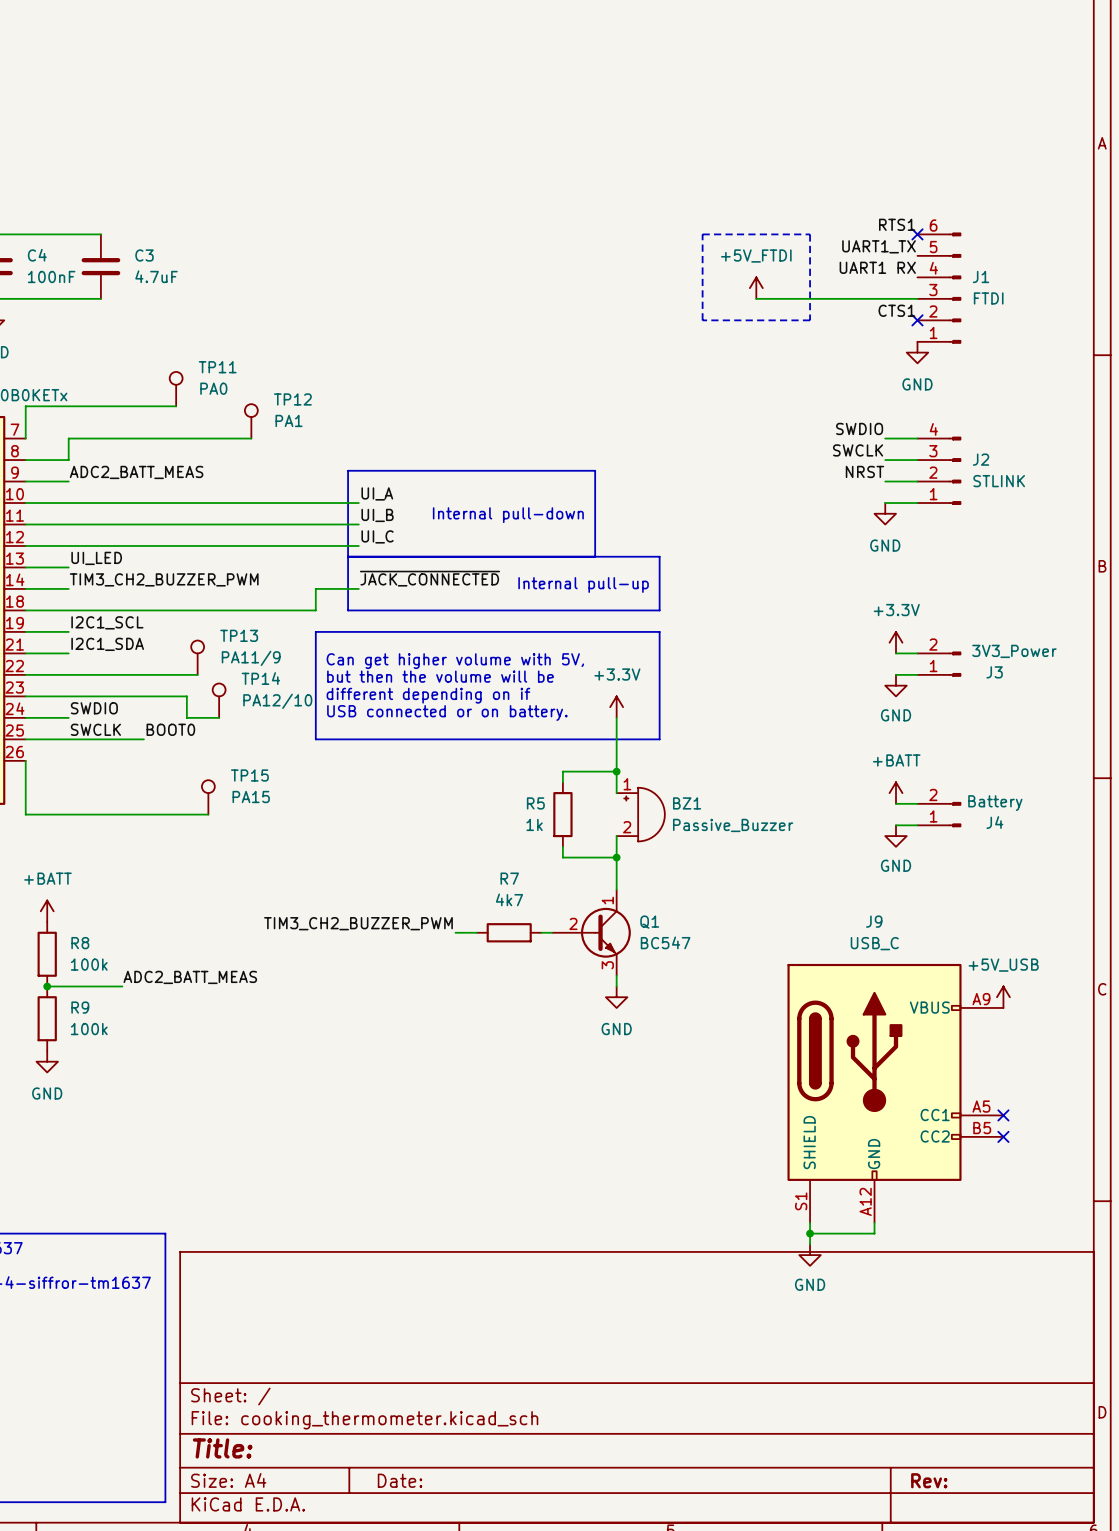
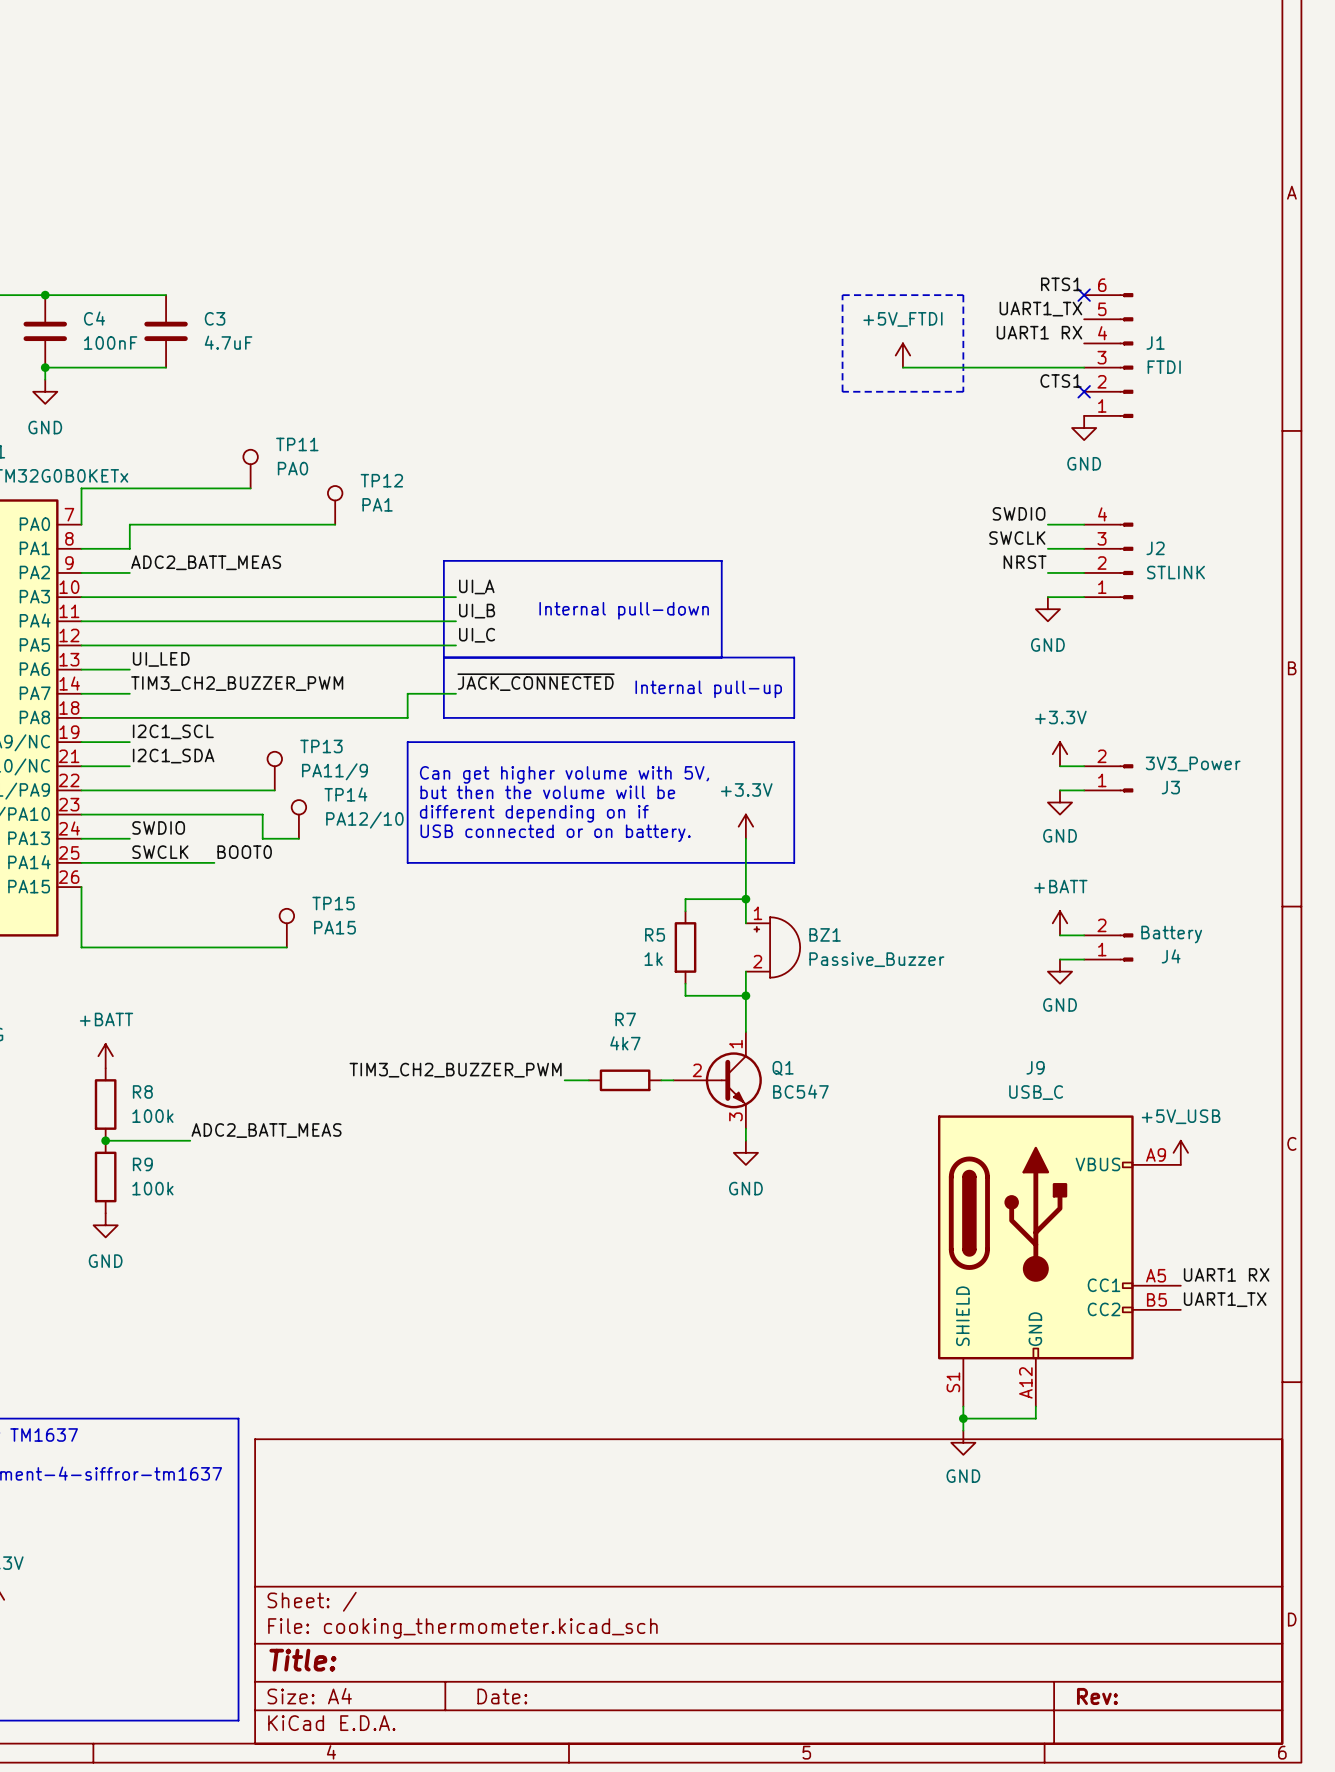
label: none -> UART1 RX (1226, 1274)
no-connect mark: (1003, 1115) -> none
label: none -> UART1_TX (1225, 1299)
no-connect mark: (1003, 1136) -> none

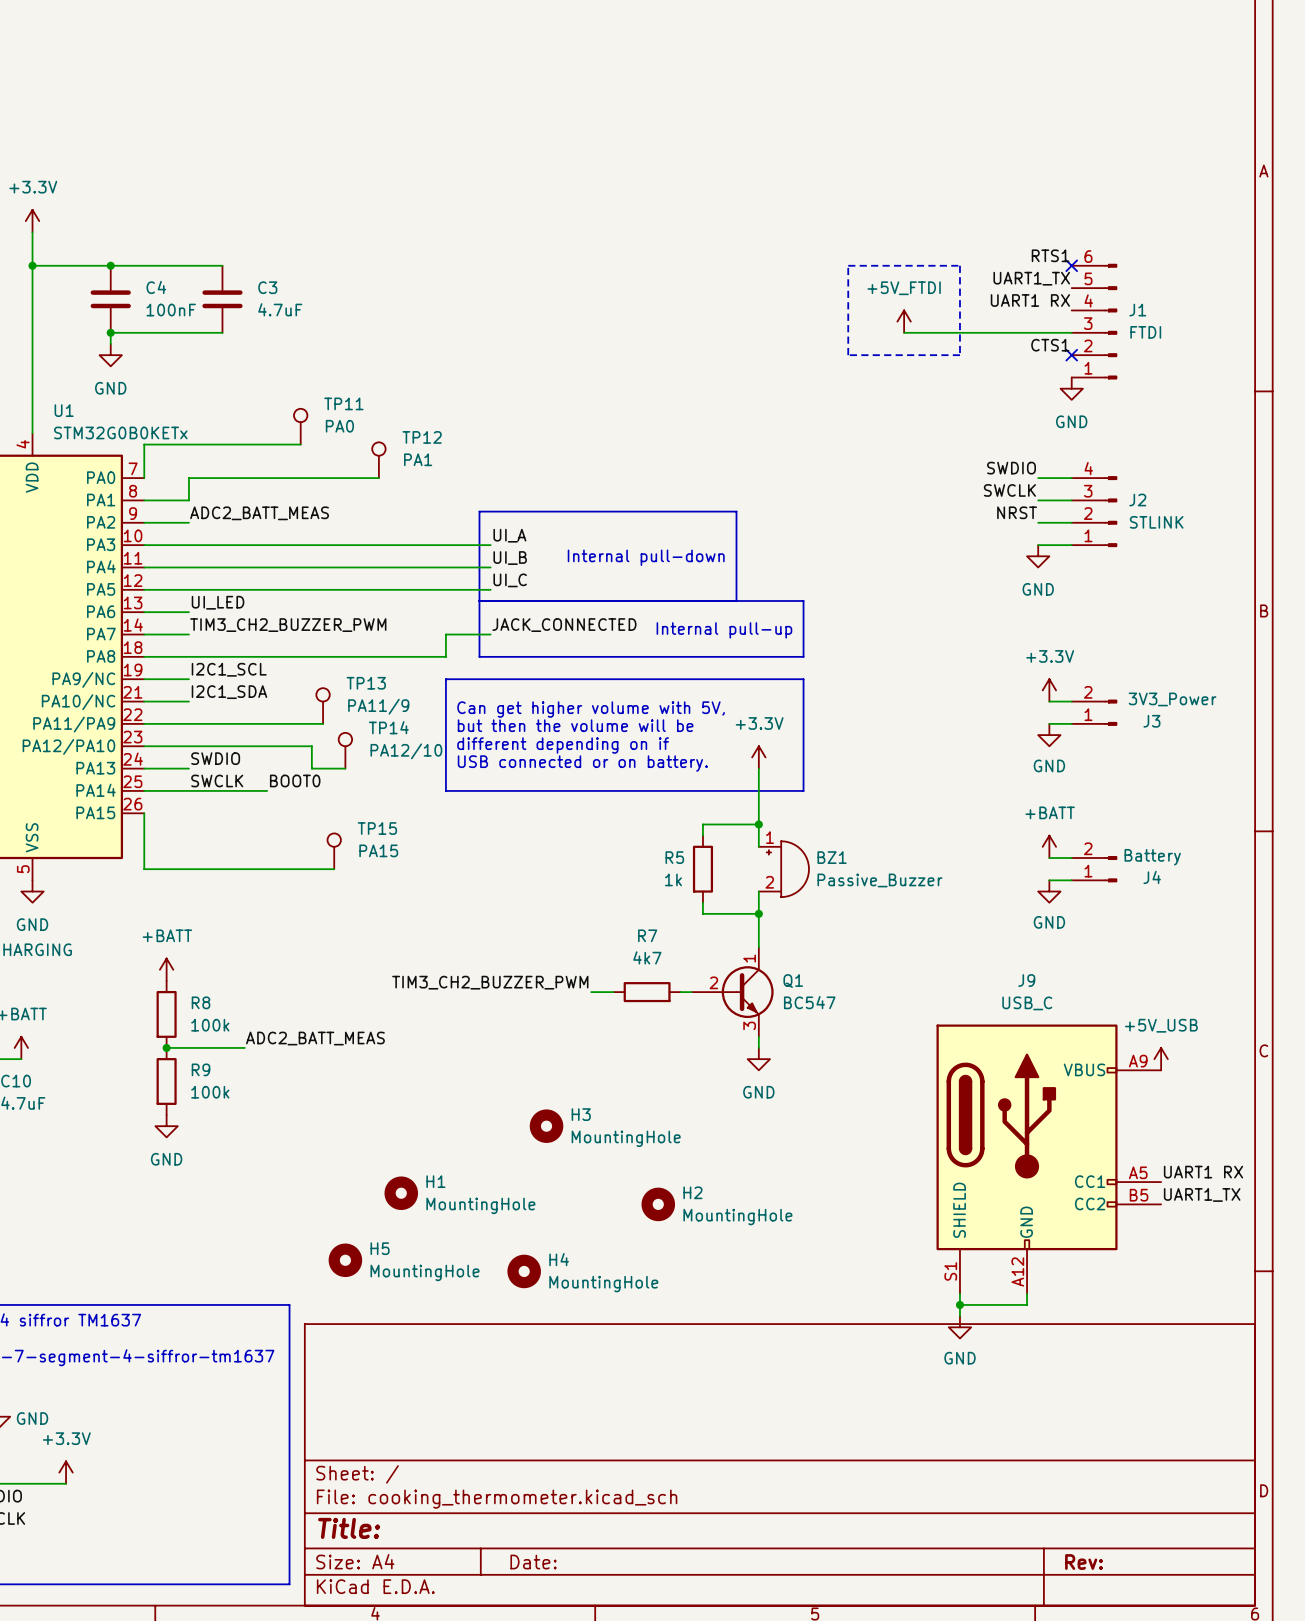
label: ~{JACK_CONNECTED} (536, 682) -> JACK_CONNECTED (564, 625)
H3: none -> MountingHole (546, 1126)
H1: none -> MountingHole (401, 1193)
H2: none -> MountingHole (658, 1204)
H5: none -> MountingHole (345, 1260)
H4: none -> MountingHole (524, 1271)

